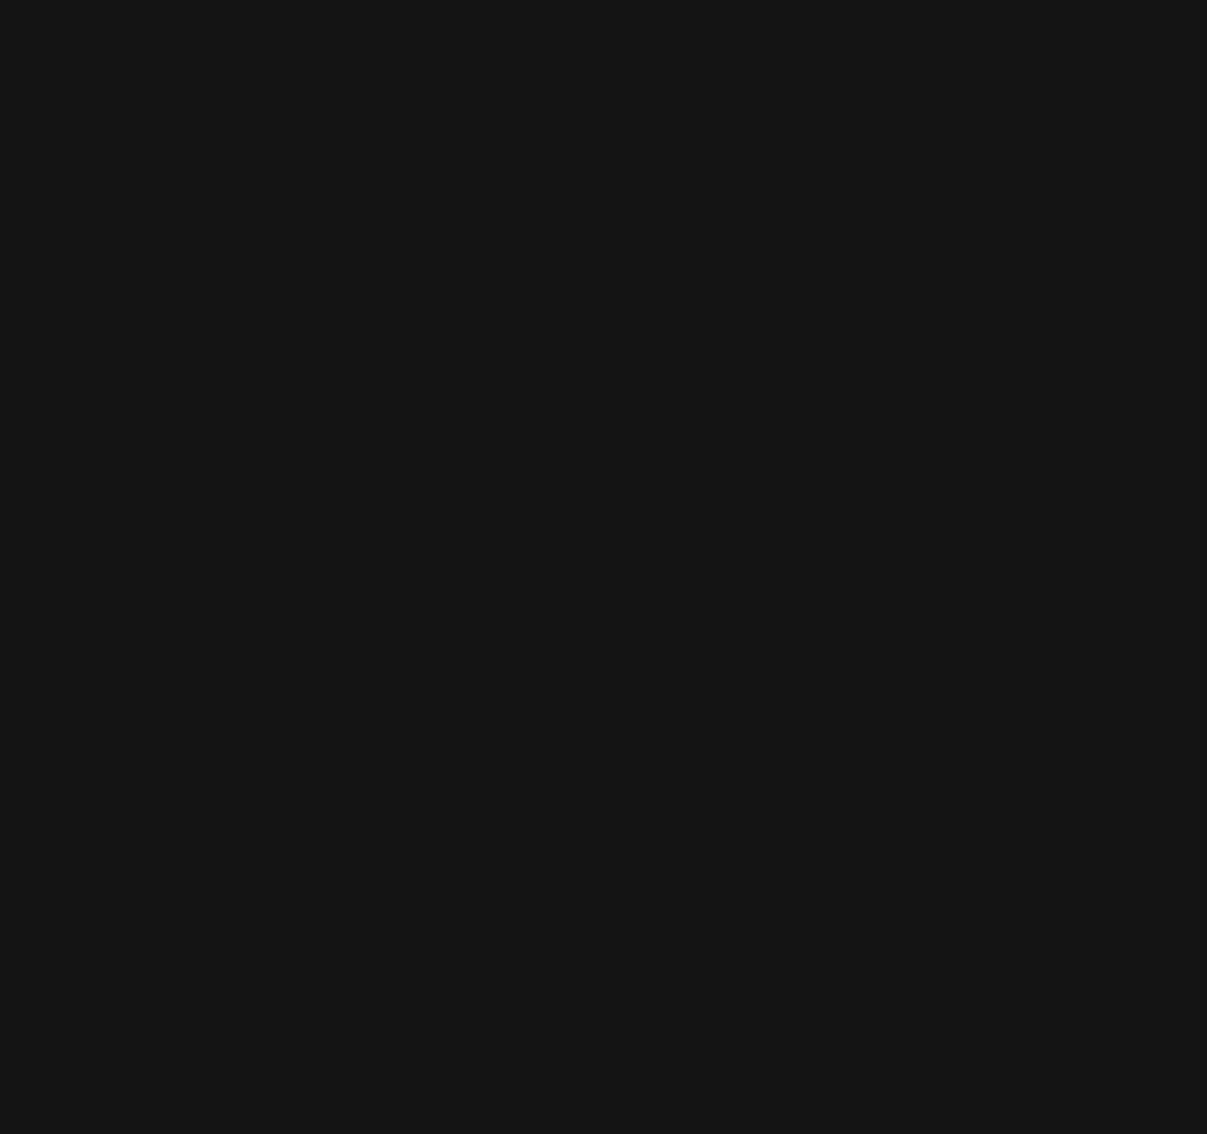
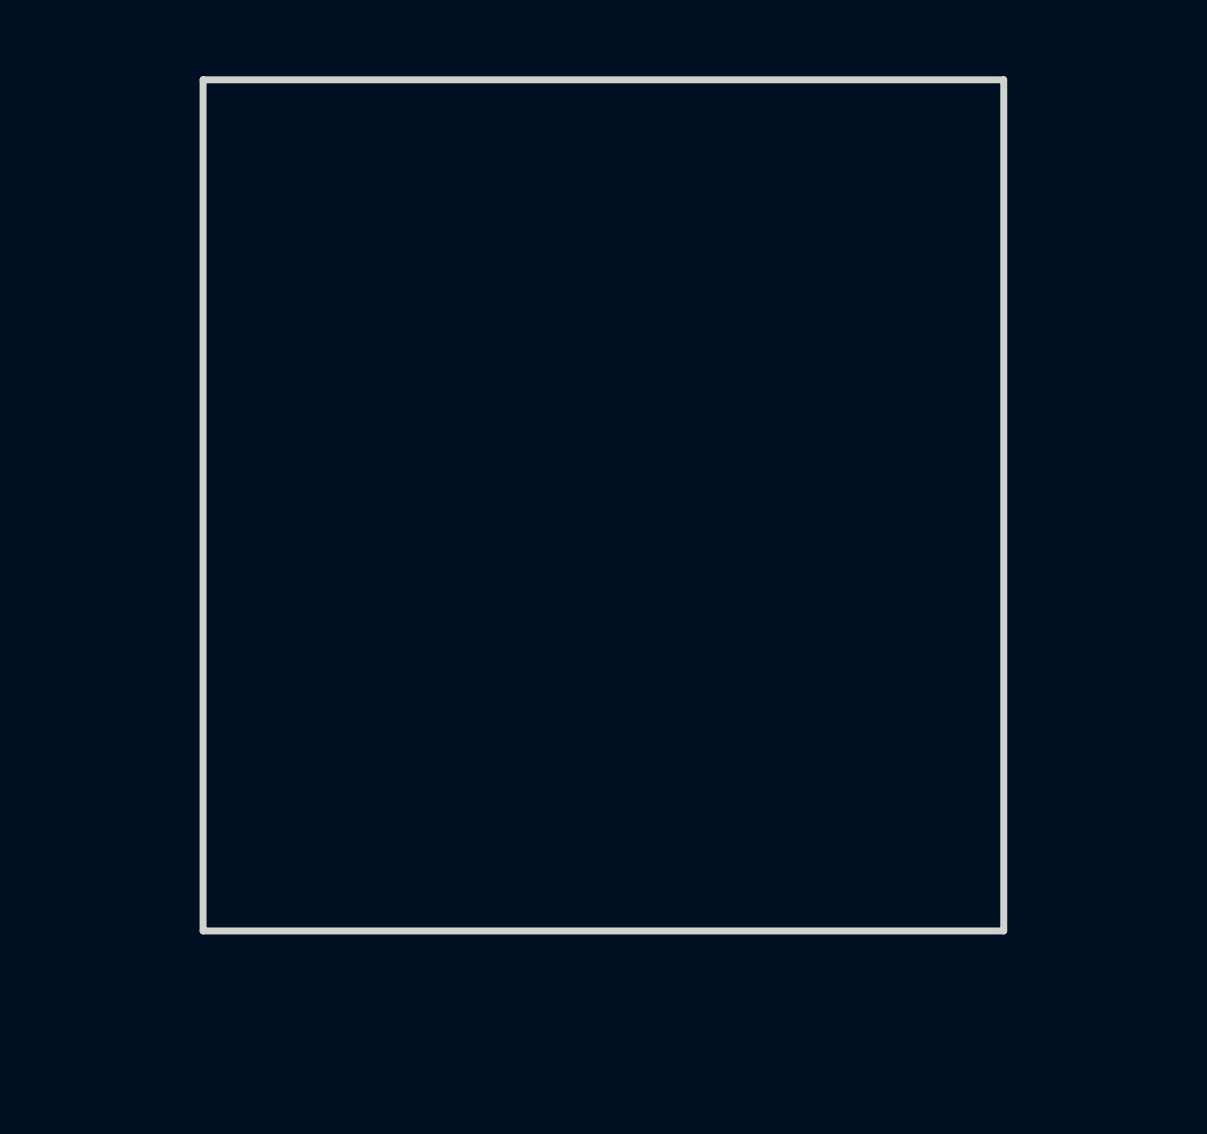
board edge: none -> (203, 79) (1003, 79) (1003, 930) (203, 930) (203, 79)

